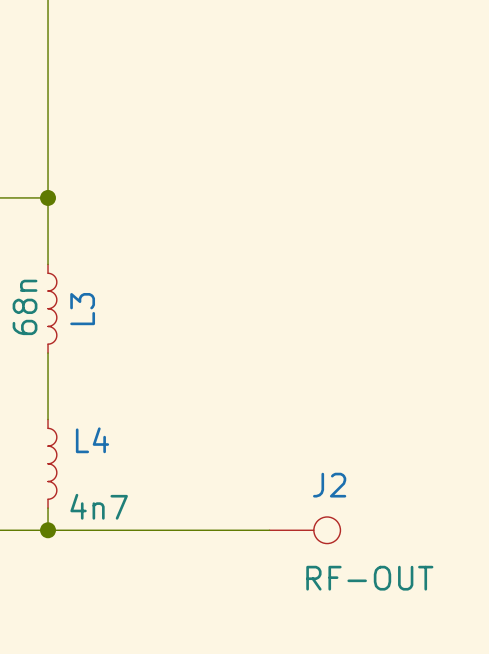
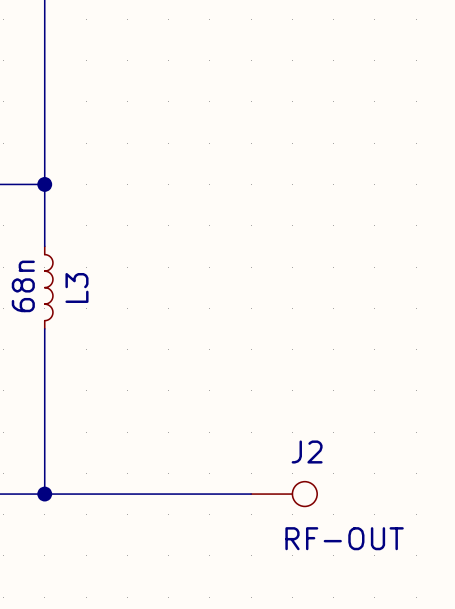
wire: none -> (44, 390) (44, 473)
L4: 4n7 (52, 463) -> none

